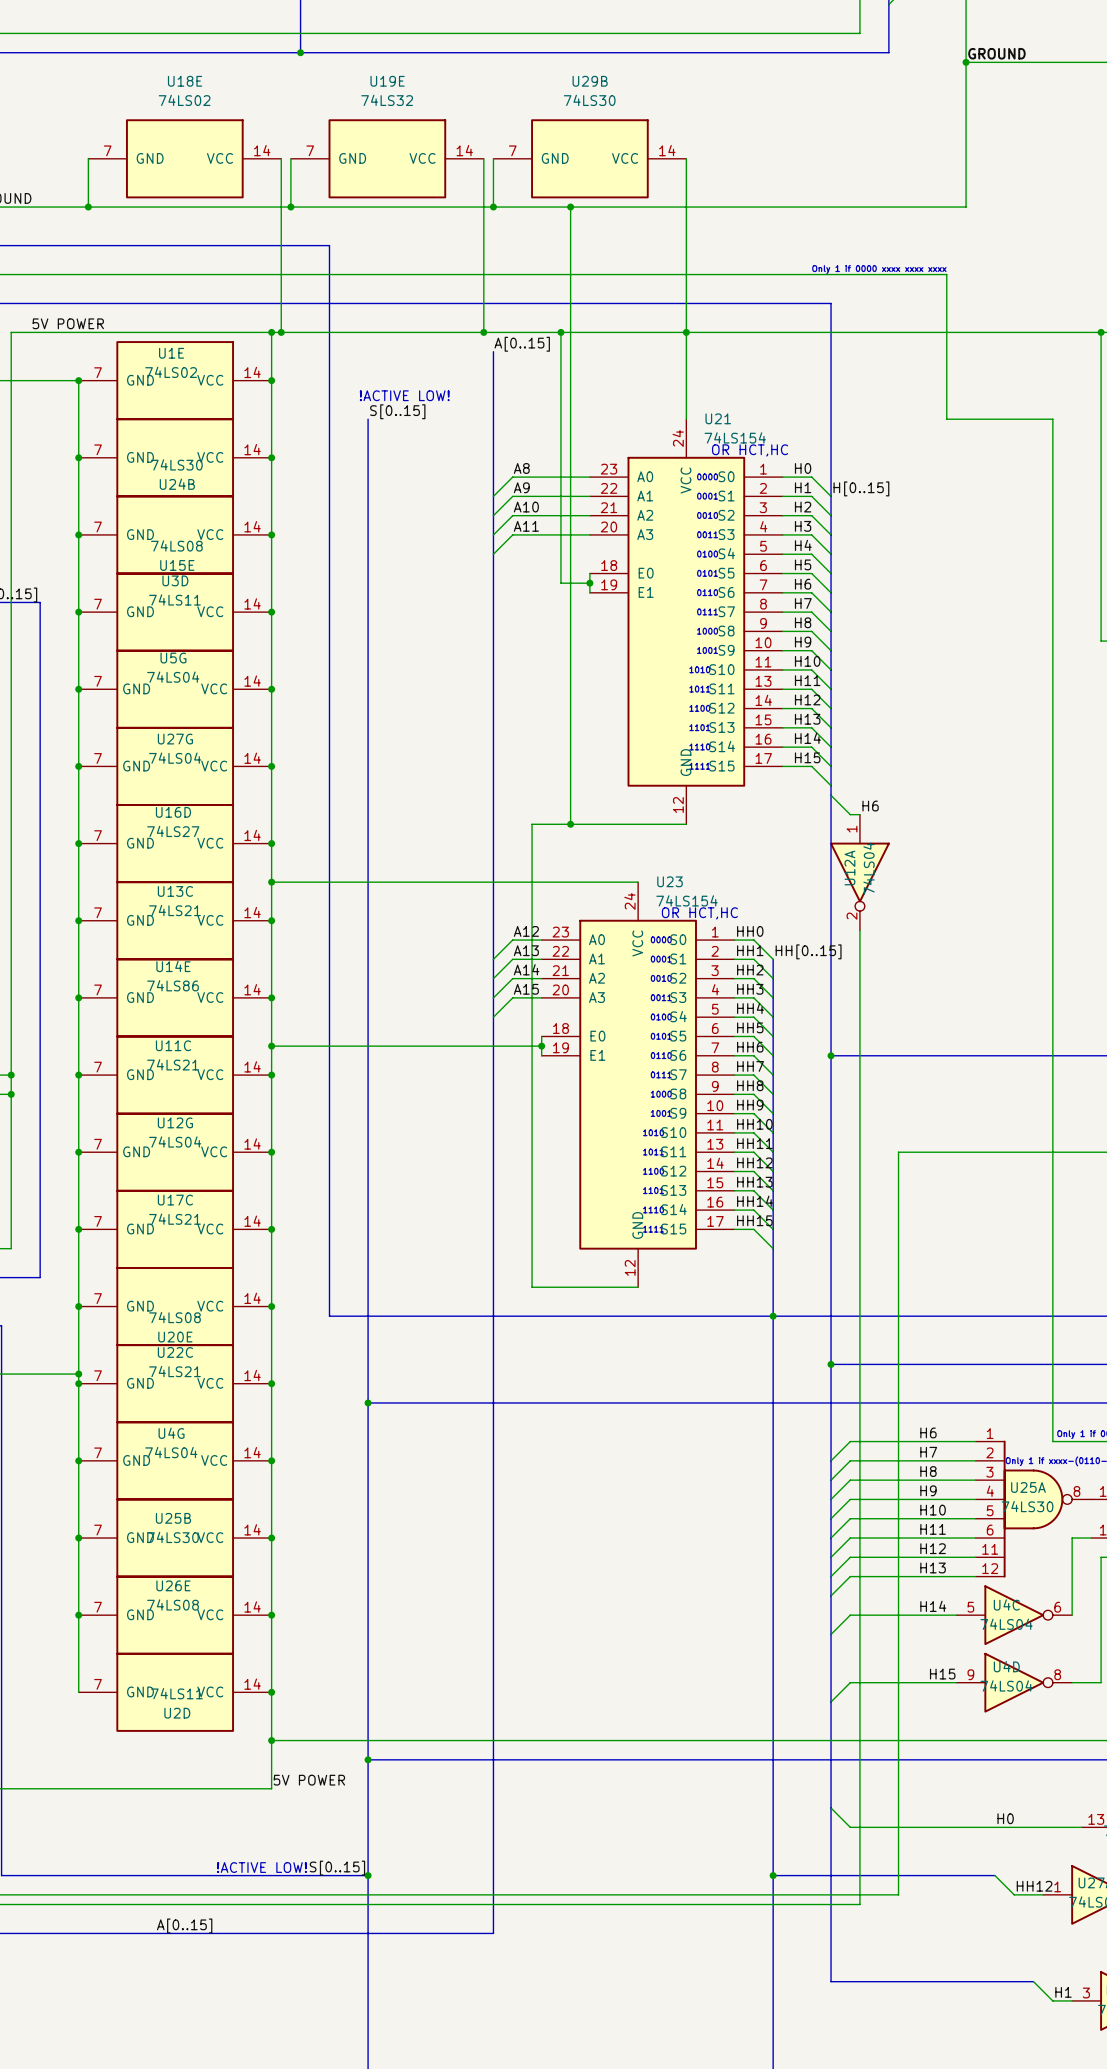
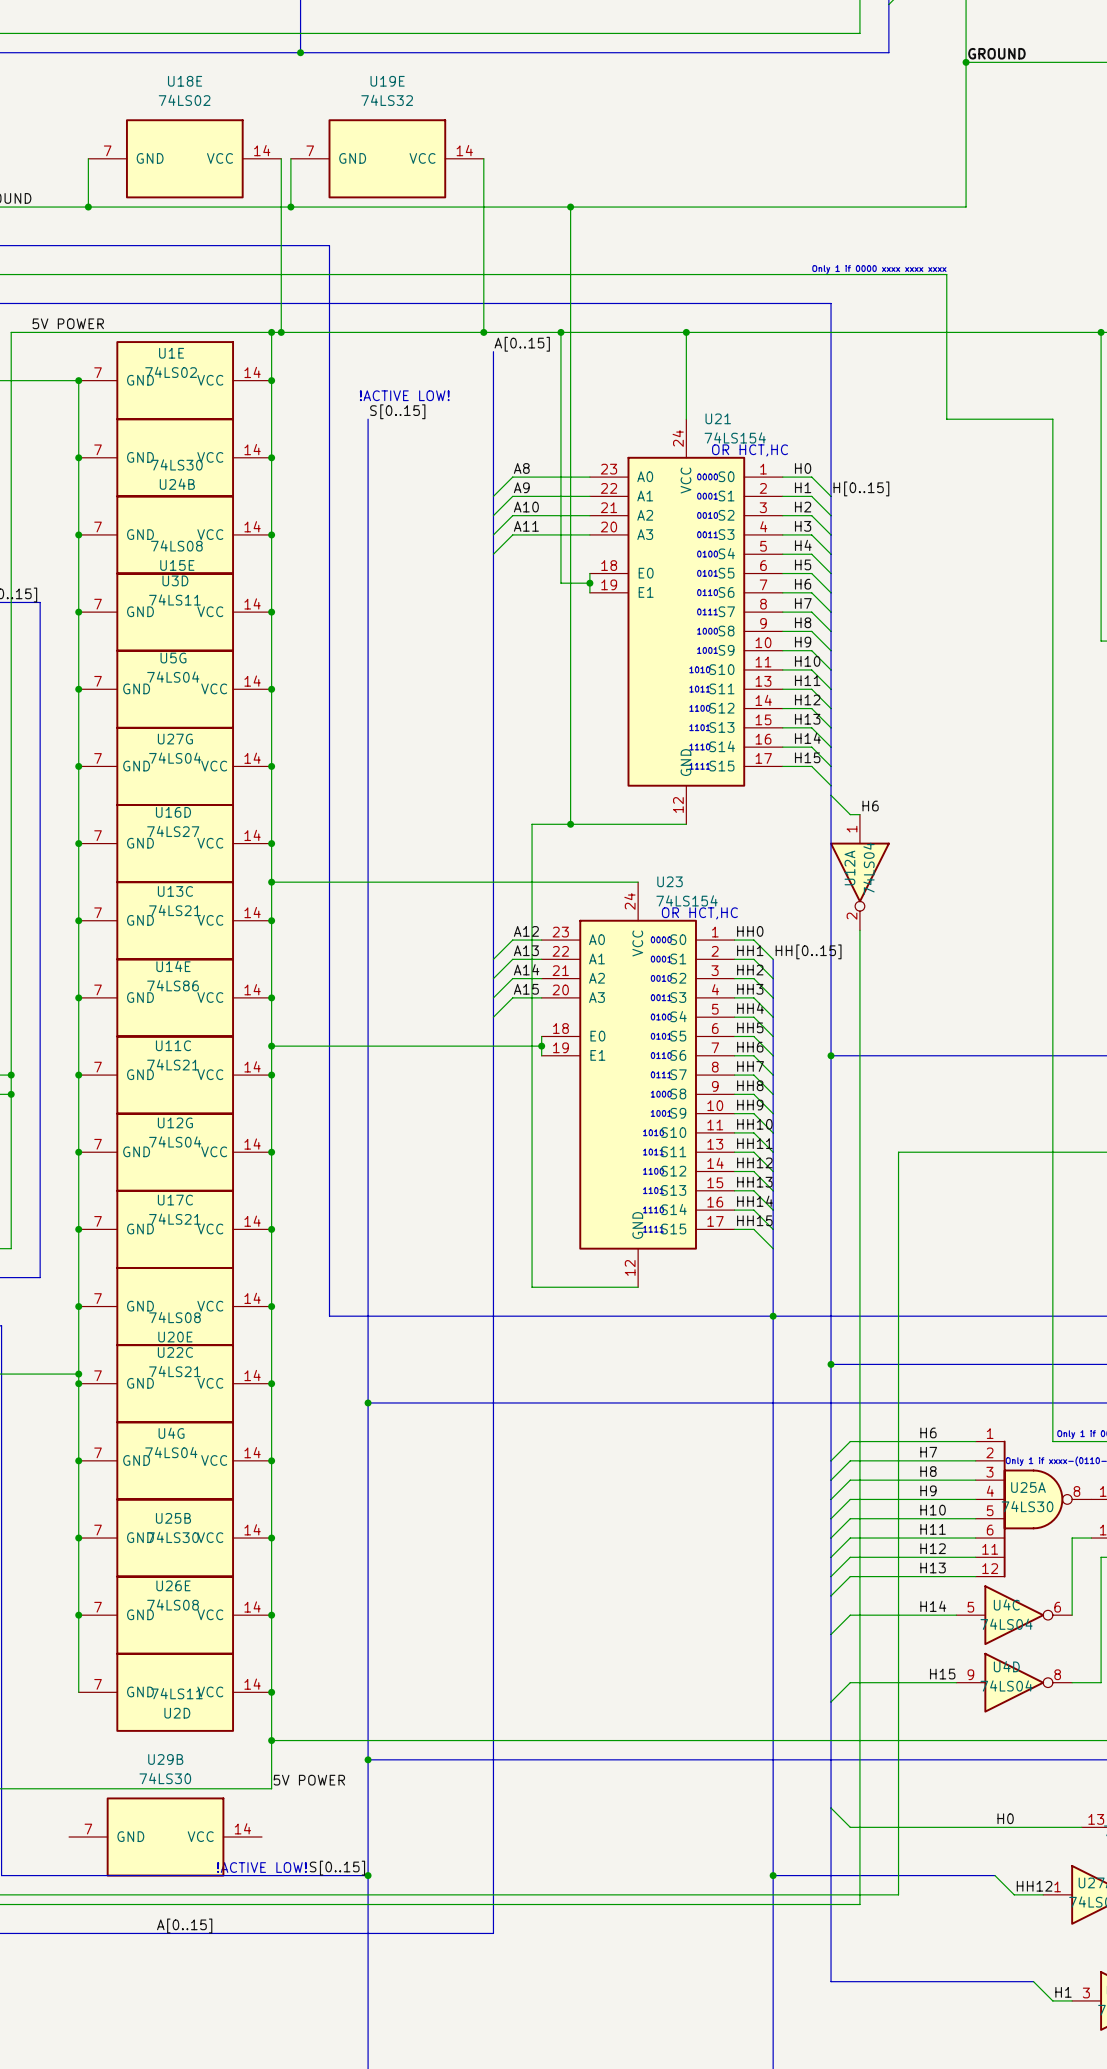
wire: (493, 158) (493, 207) -> none
U29B position: (589, 158) -> (165, 1837)
wire: (686, 158) (686, 332) -> none
junction: (493, 207) -> none

